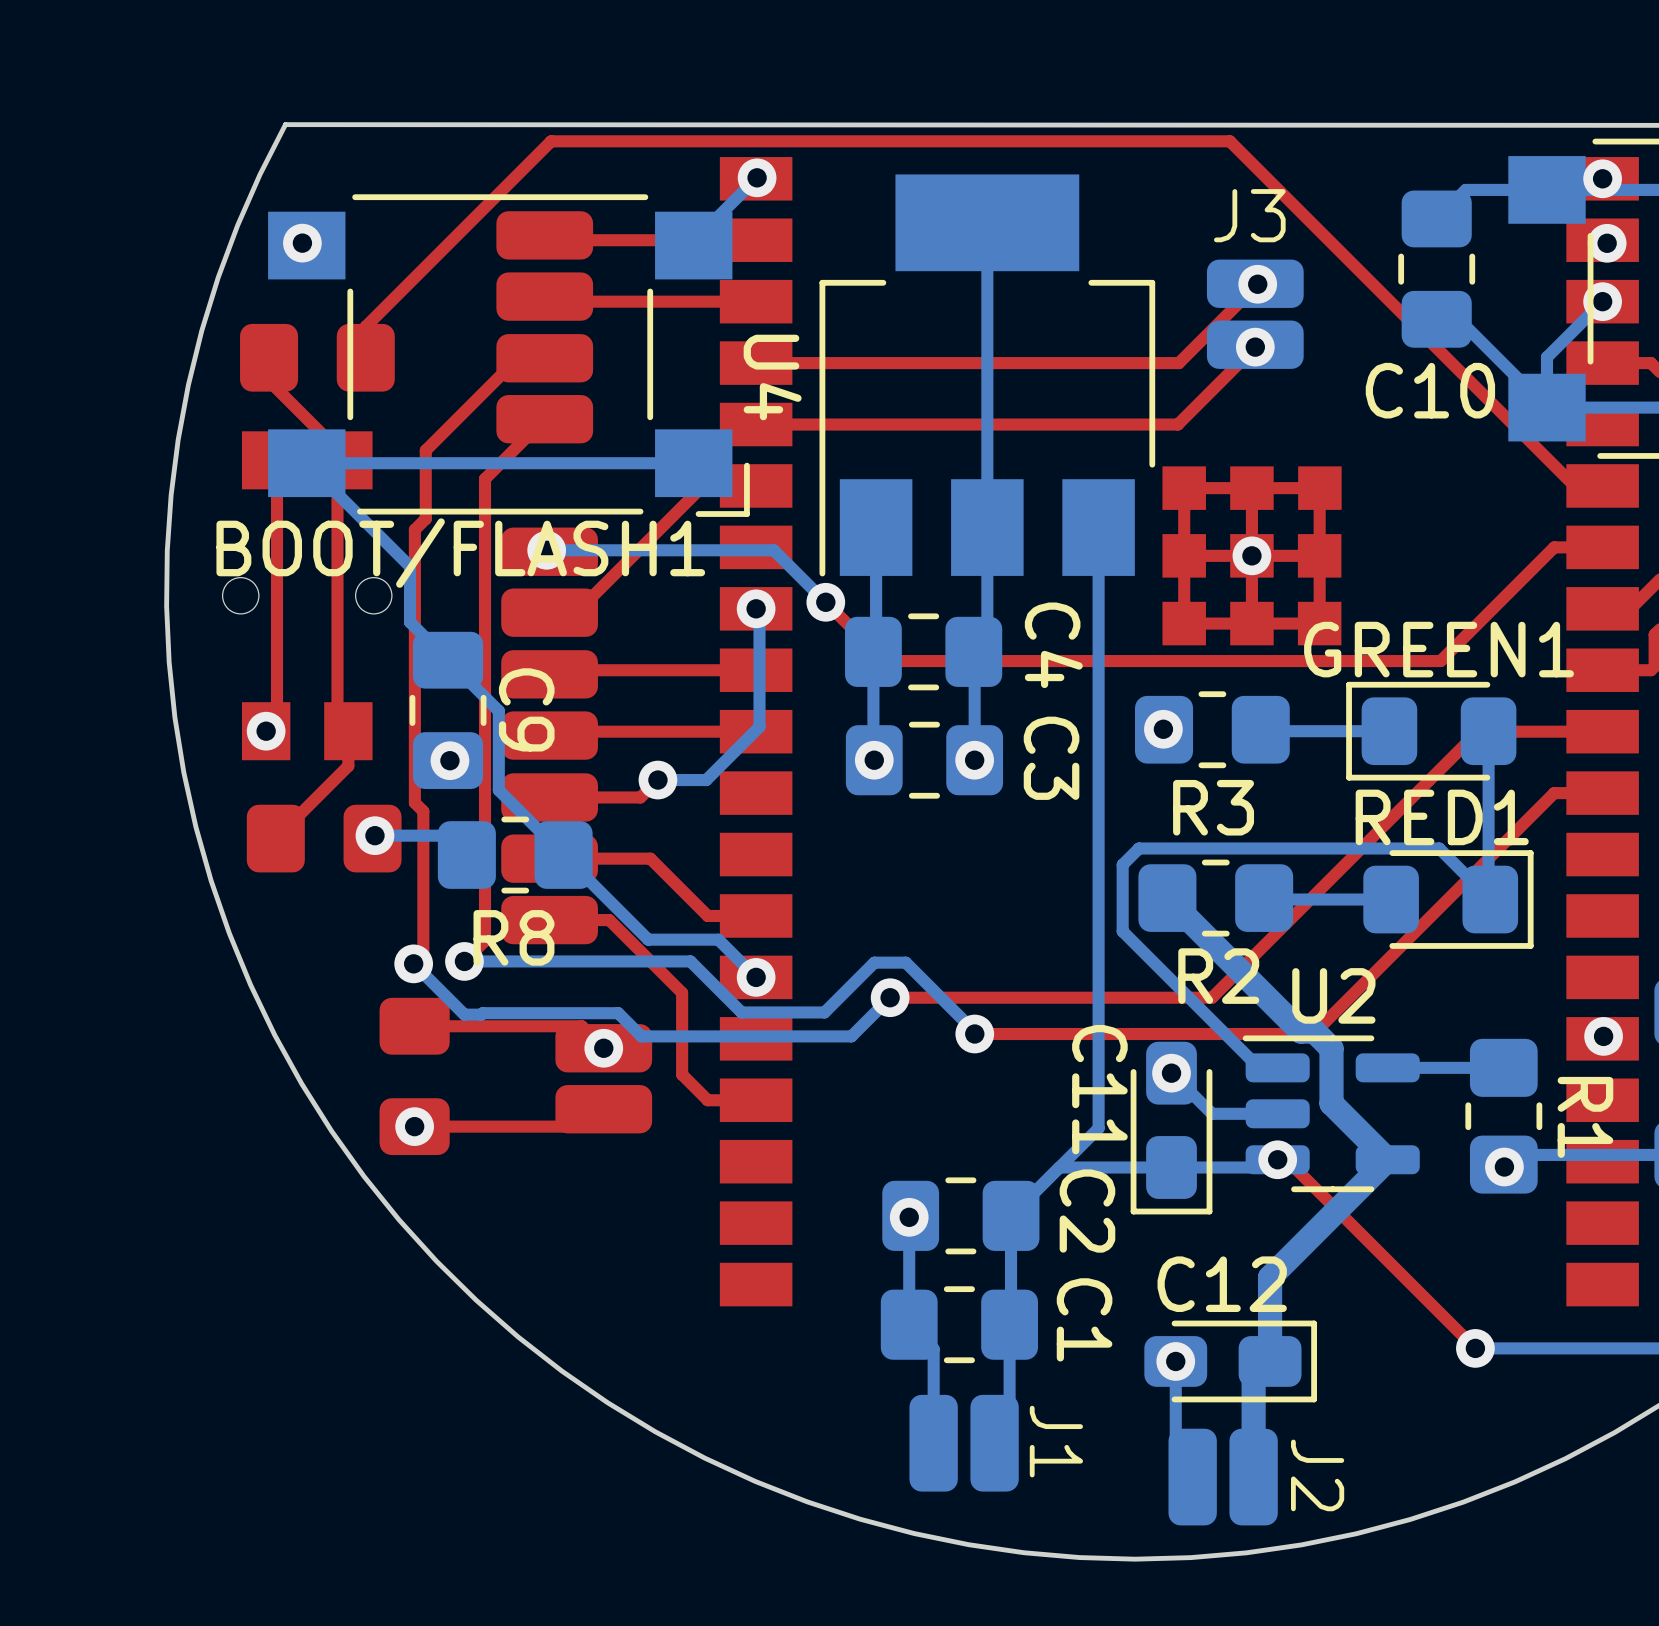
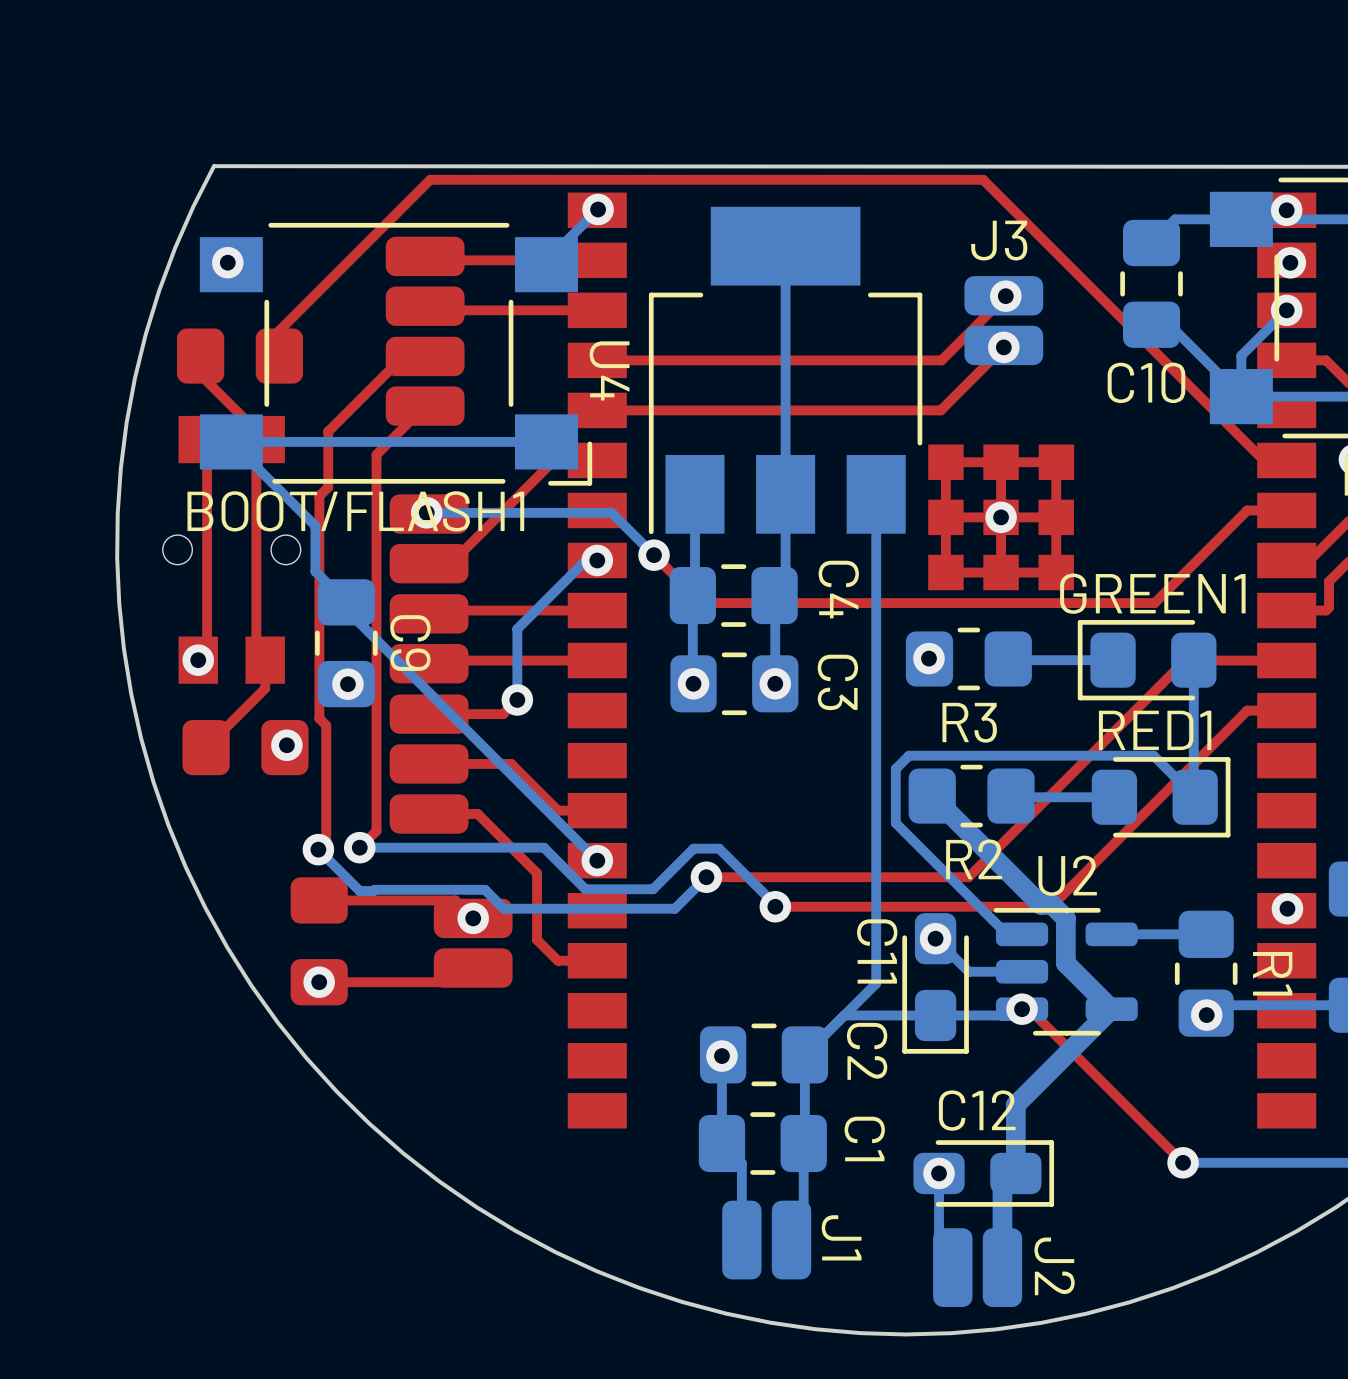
bottom track: (756, 608) (759, 612) (759, 726) (706, 780) (657, 780) -> (596, 560) (586, 560) (517, 629) (517, 699)
bottom track: (448, 660) (498, 711) (498, 790) (648, 939) (718, 939) -> (346, 602) (346, 609) (566, 829)
bottom track: (374, 835) (447, 835) (466, 855) -> none
R8: (515, 855) -> none

